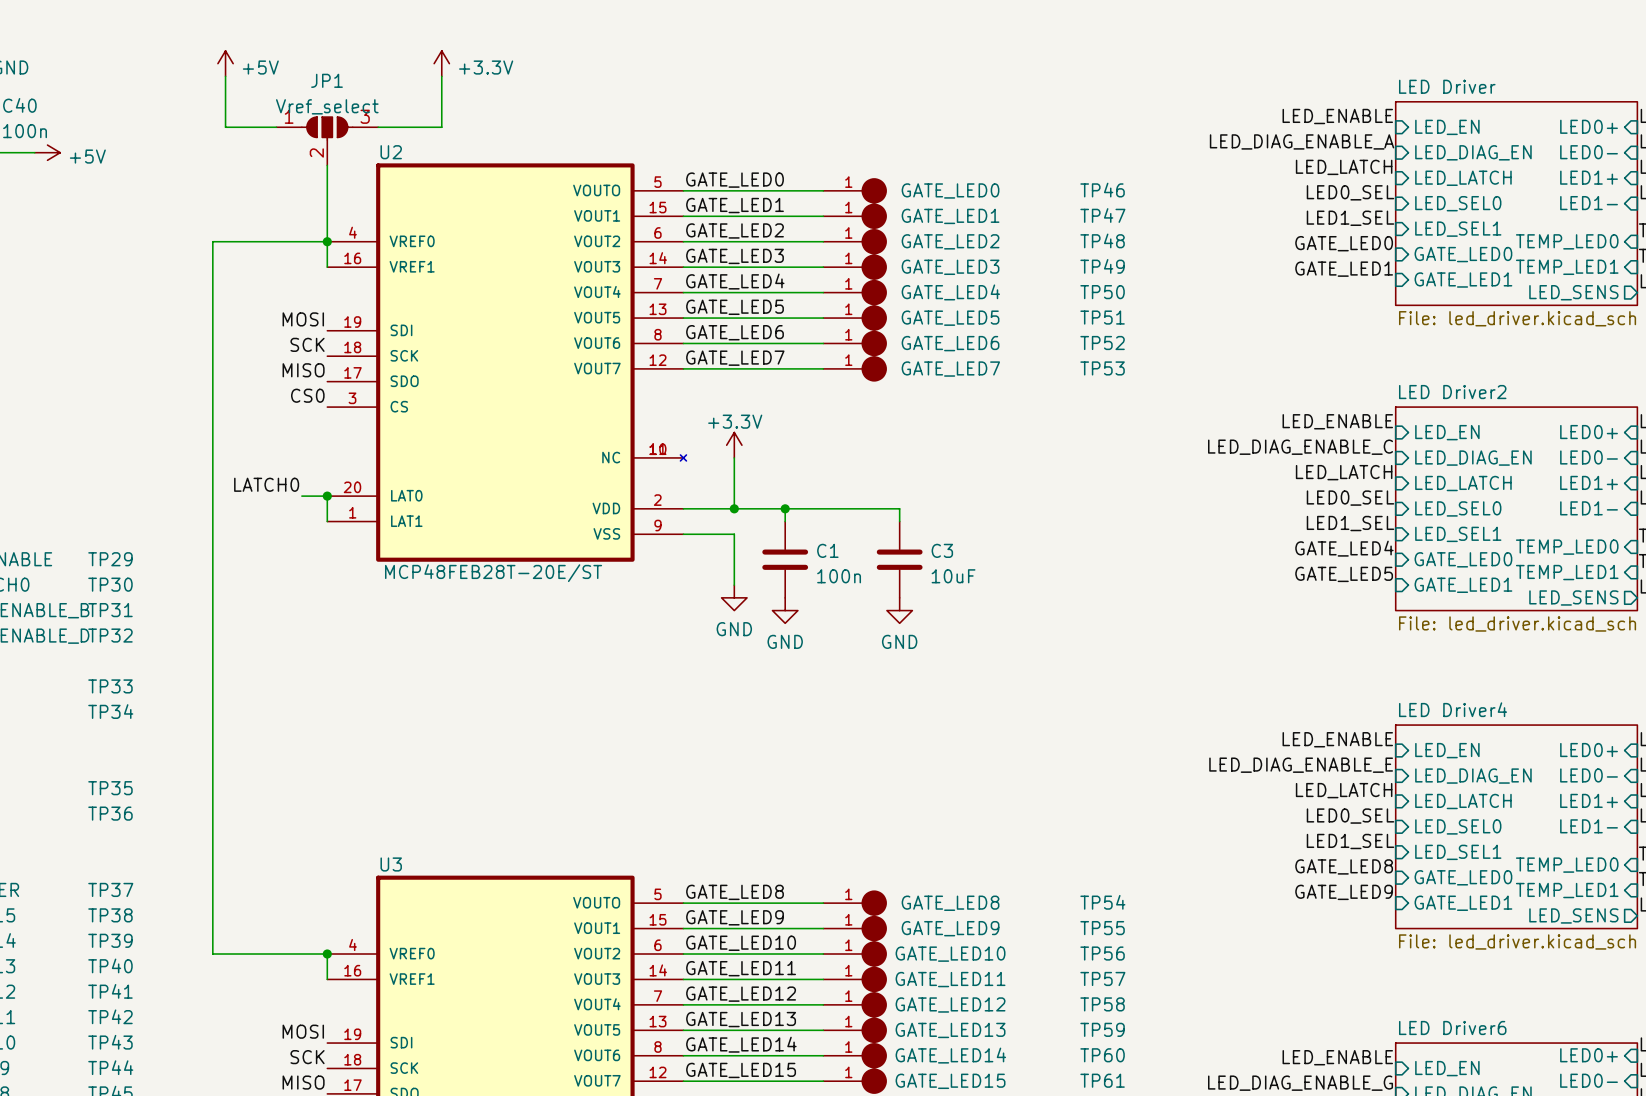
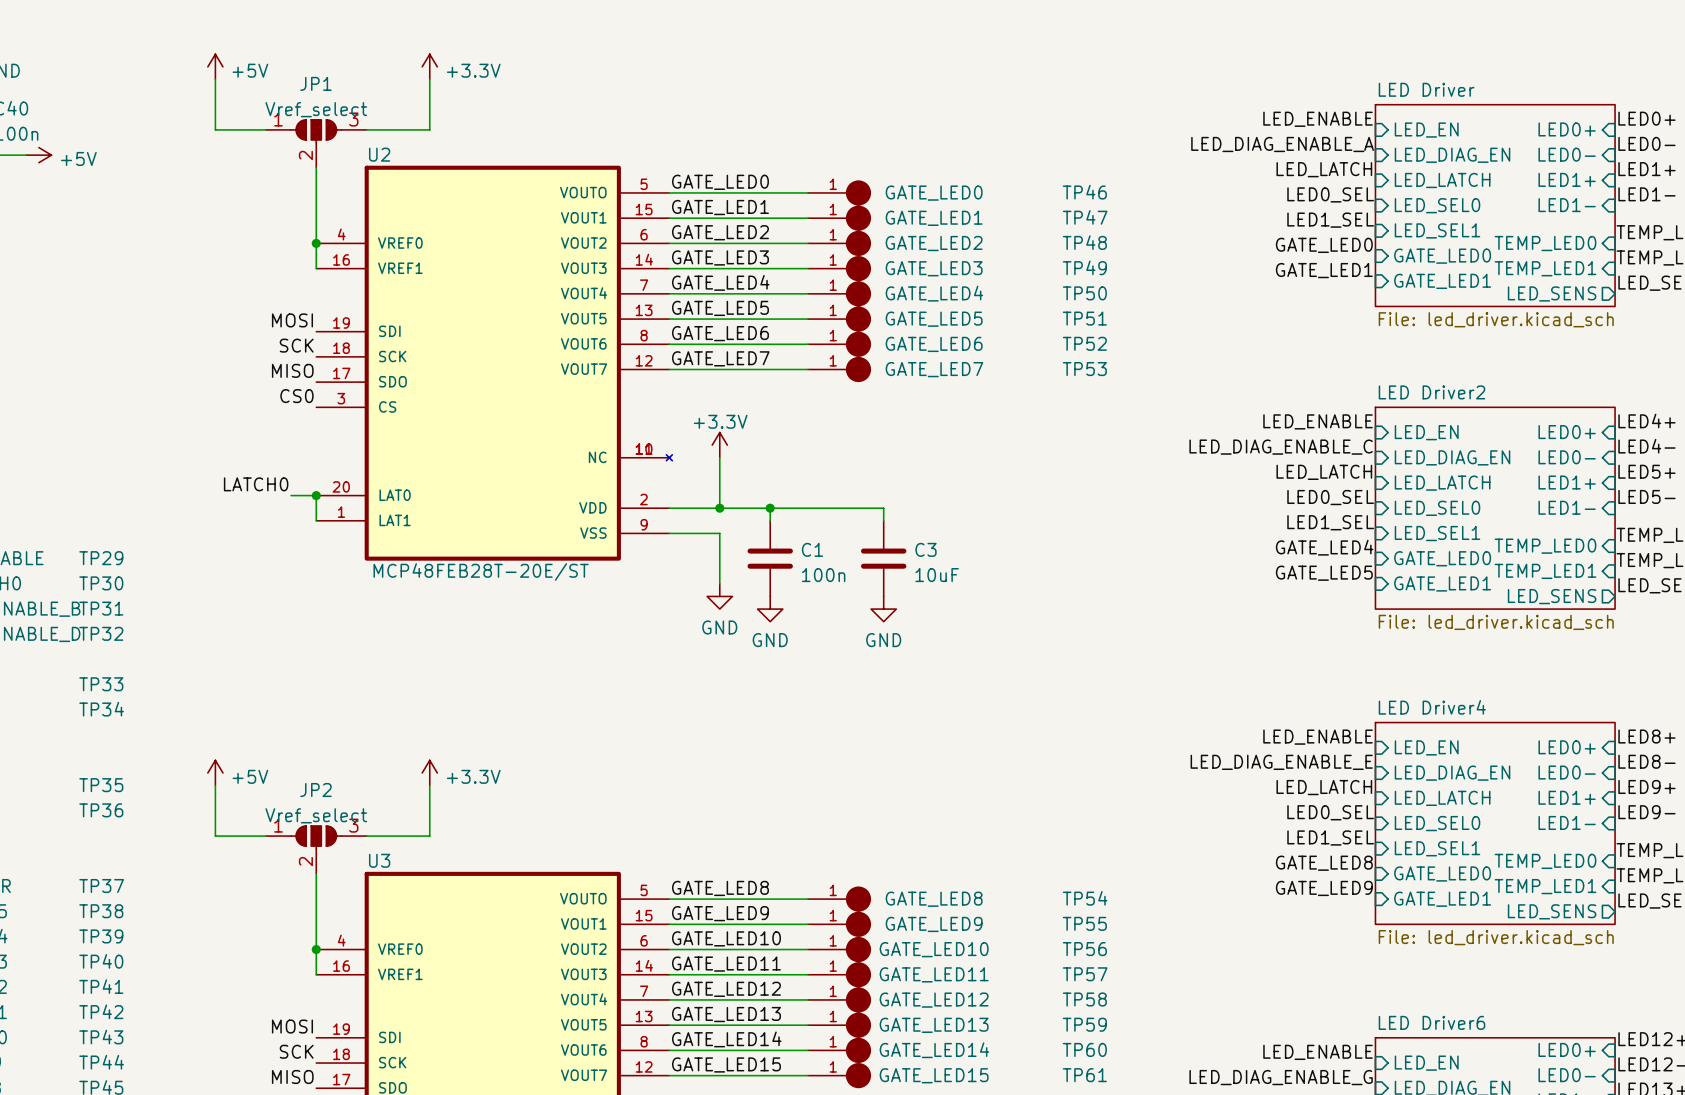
wire: (327, 241) (212, 241) (212, 954) (327, 954) -> (316, 873) (316, 949)
power symbol: none -> +5V (215, 773)
power symbol: none -> +3.3V (429, 773)
wire: none -> (215, 785) (215, 836) (265, 836)
wire: none -> (429, 785) (429, 836) (366, 836)
JP2: none -> Vref_select (316, 849)

